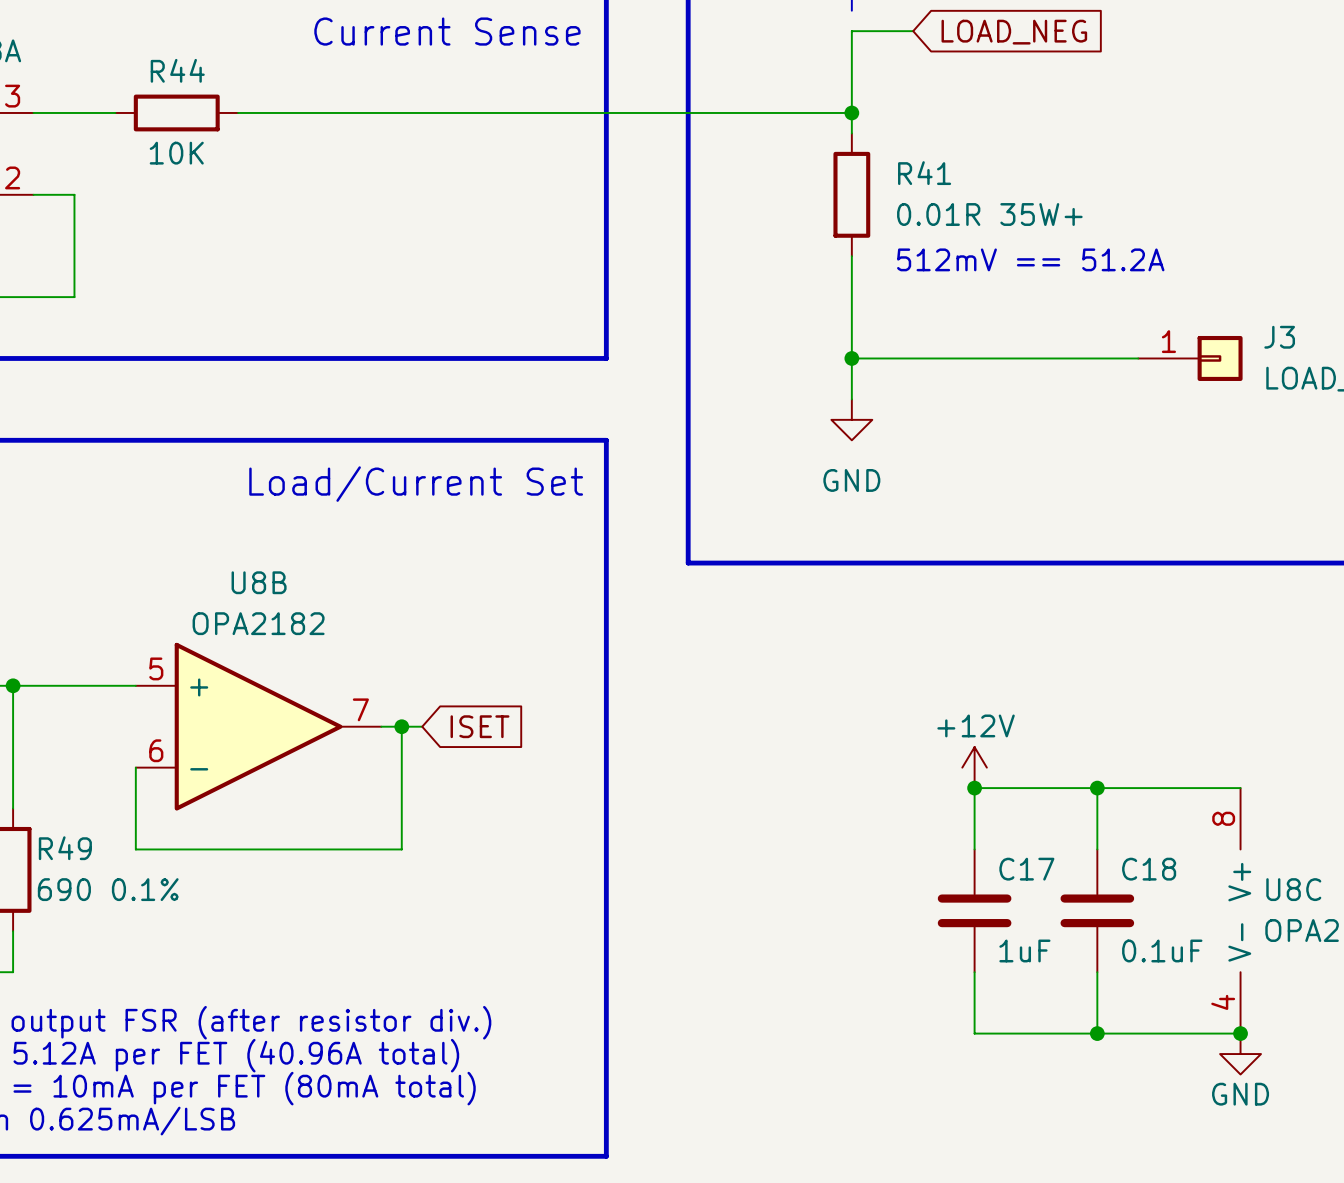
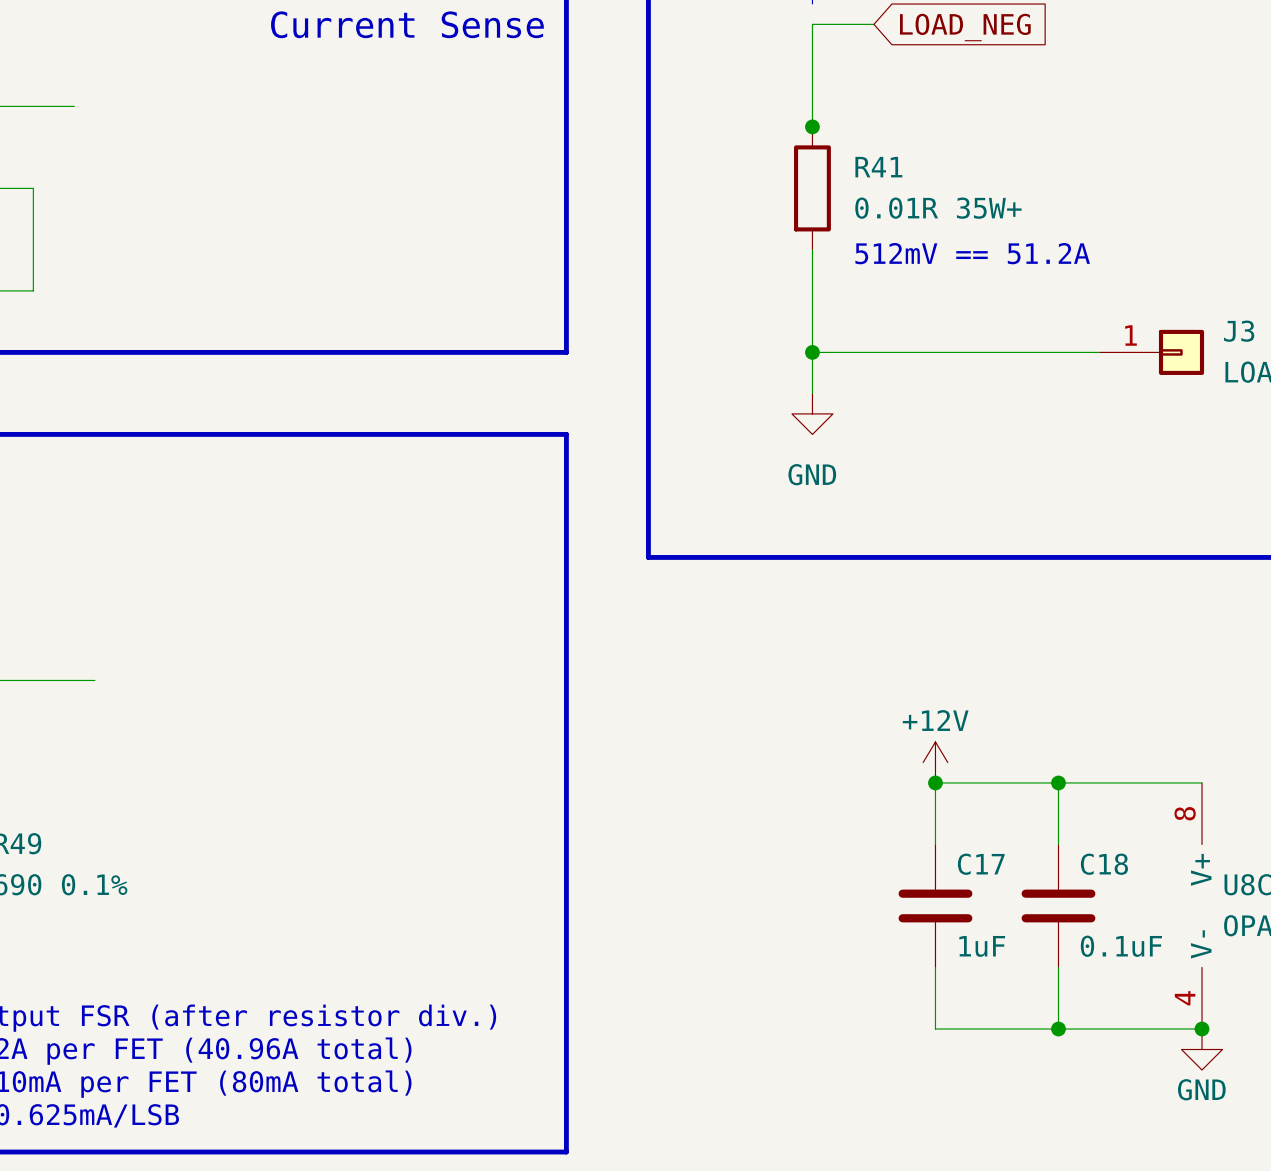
R44: 10K (176, 112) -> none
wire: (238, 112) (851, 112) -> none
junction position: (851, 112) -> (812, 126)
text: Load/Current Set (416, 484) -> none
U8B: OPA2182 (258, 726) -> none
wire: (381, 726) (422, 726) -> none
wire: (401, 726) (401, 849) (135, 849) (135, 767) -> none
junction: (401, 726) -> none
global label: ISET (479, 726) -> none

